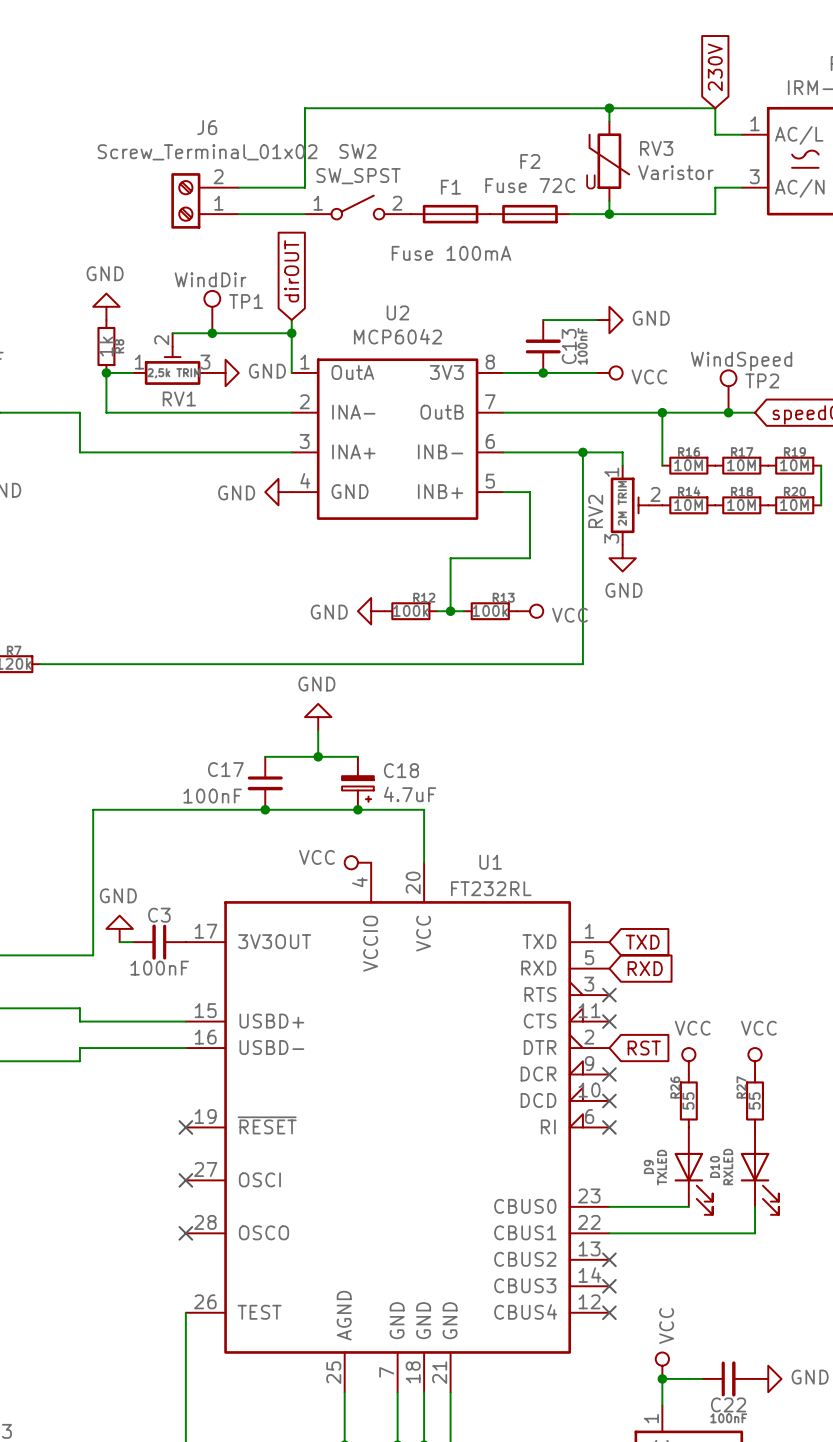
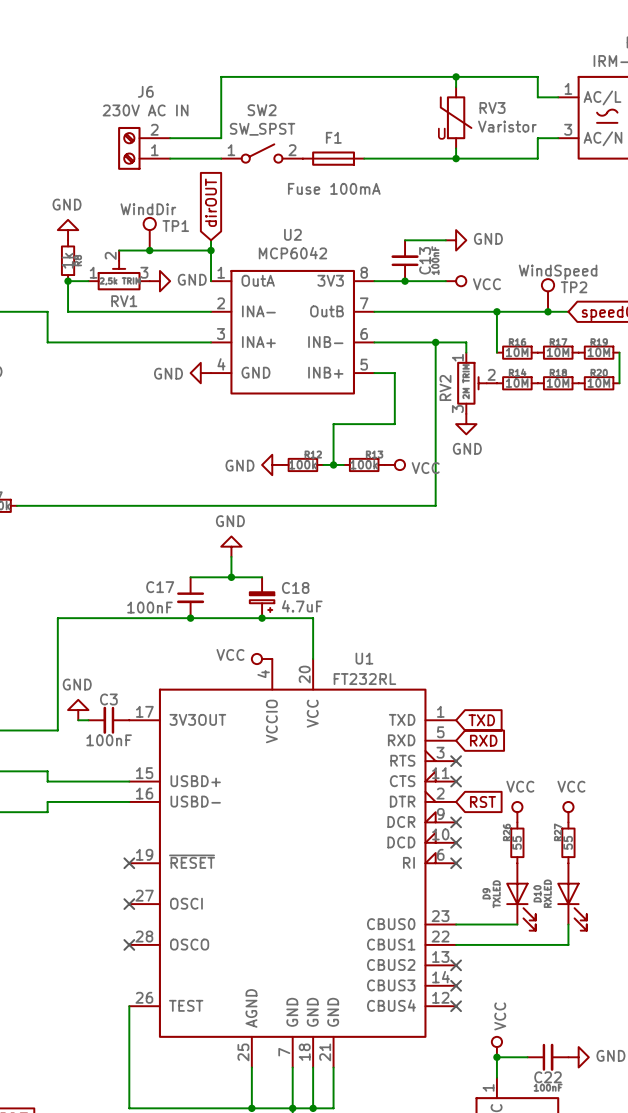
global label: 230V (715, 67) -> none
J6 value: Screw_Terminal_01x02 (207, 152) -> 230V AC IN (145, 110)
F2: Fuse 72C (529, 214) -> none

